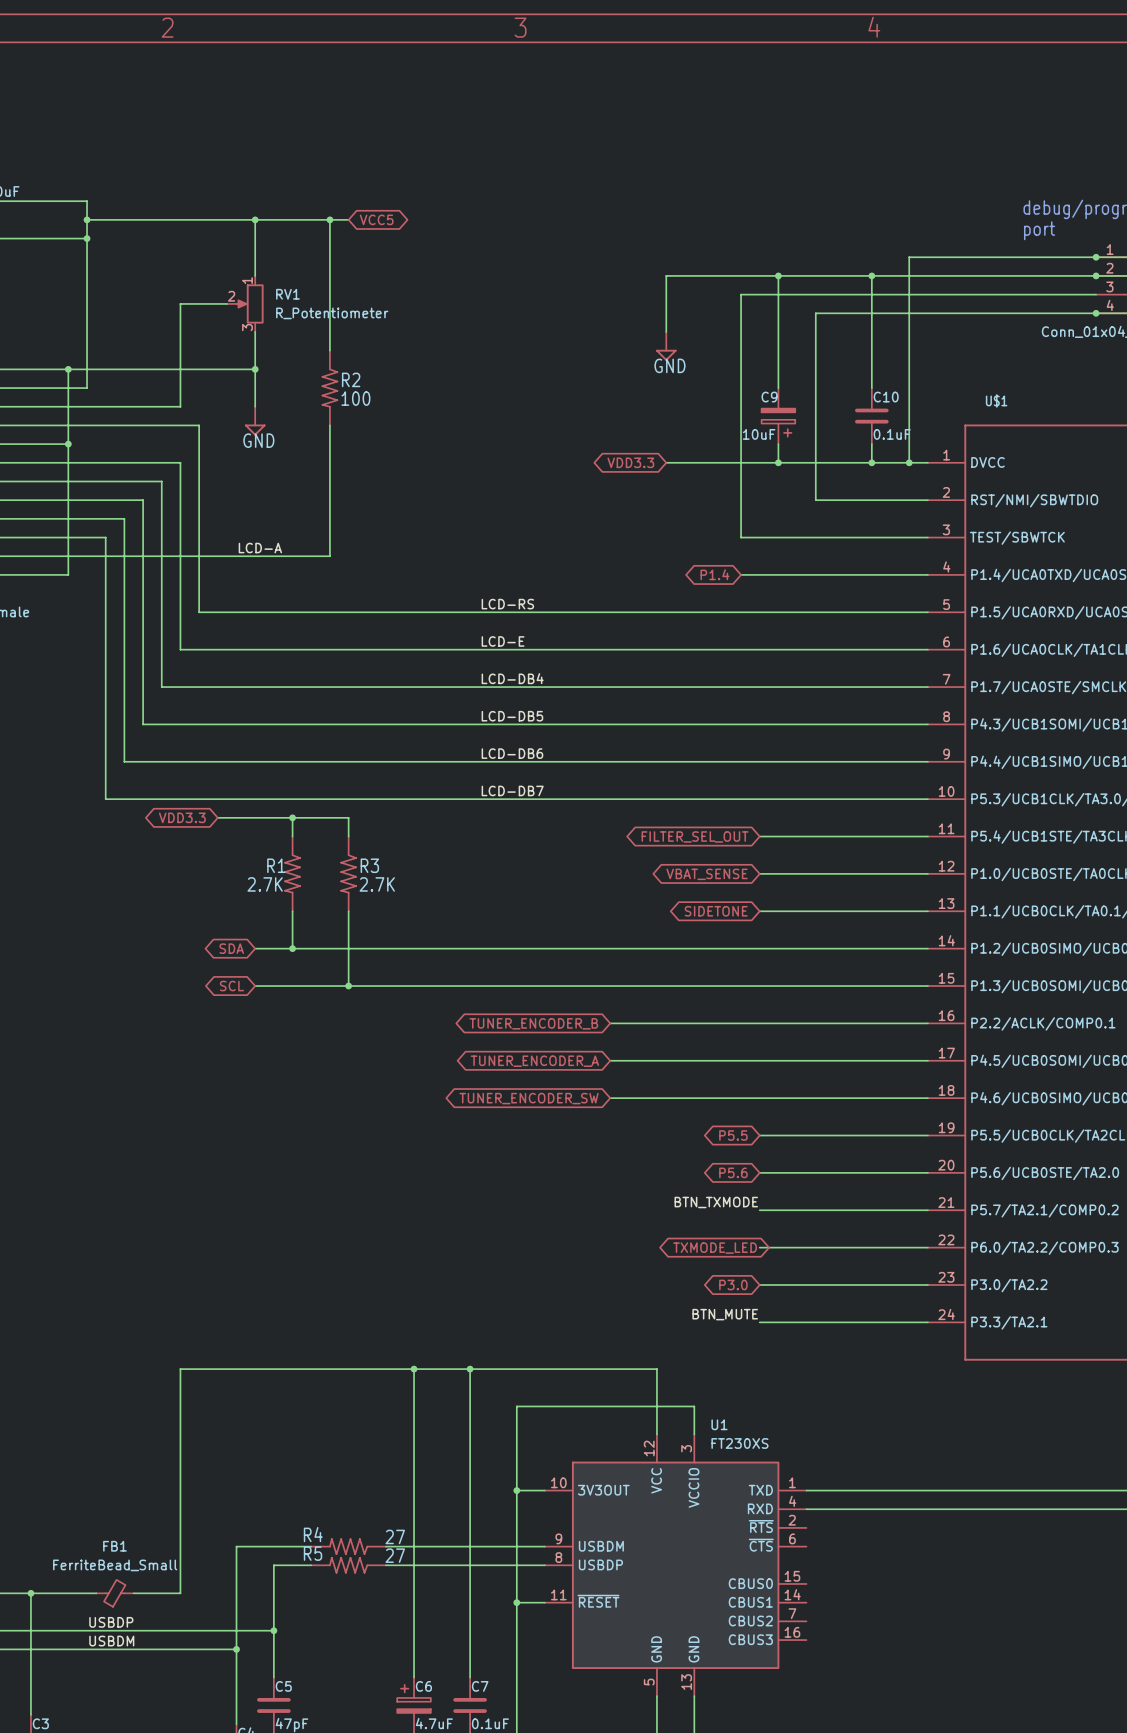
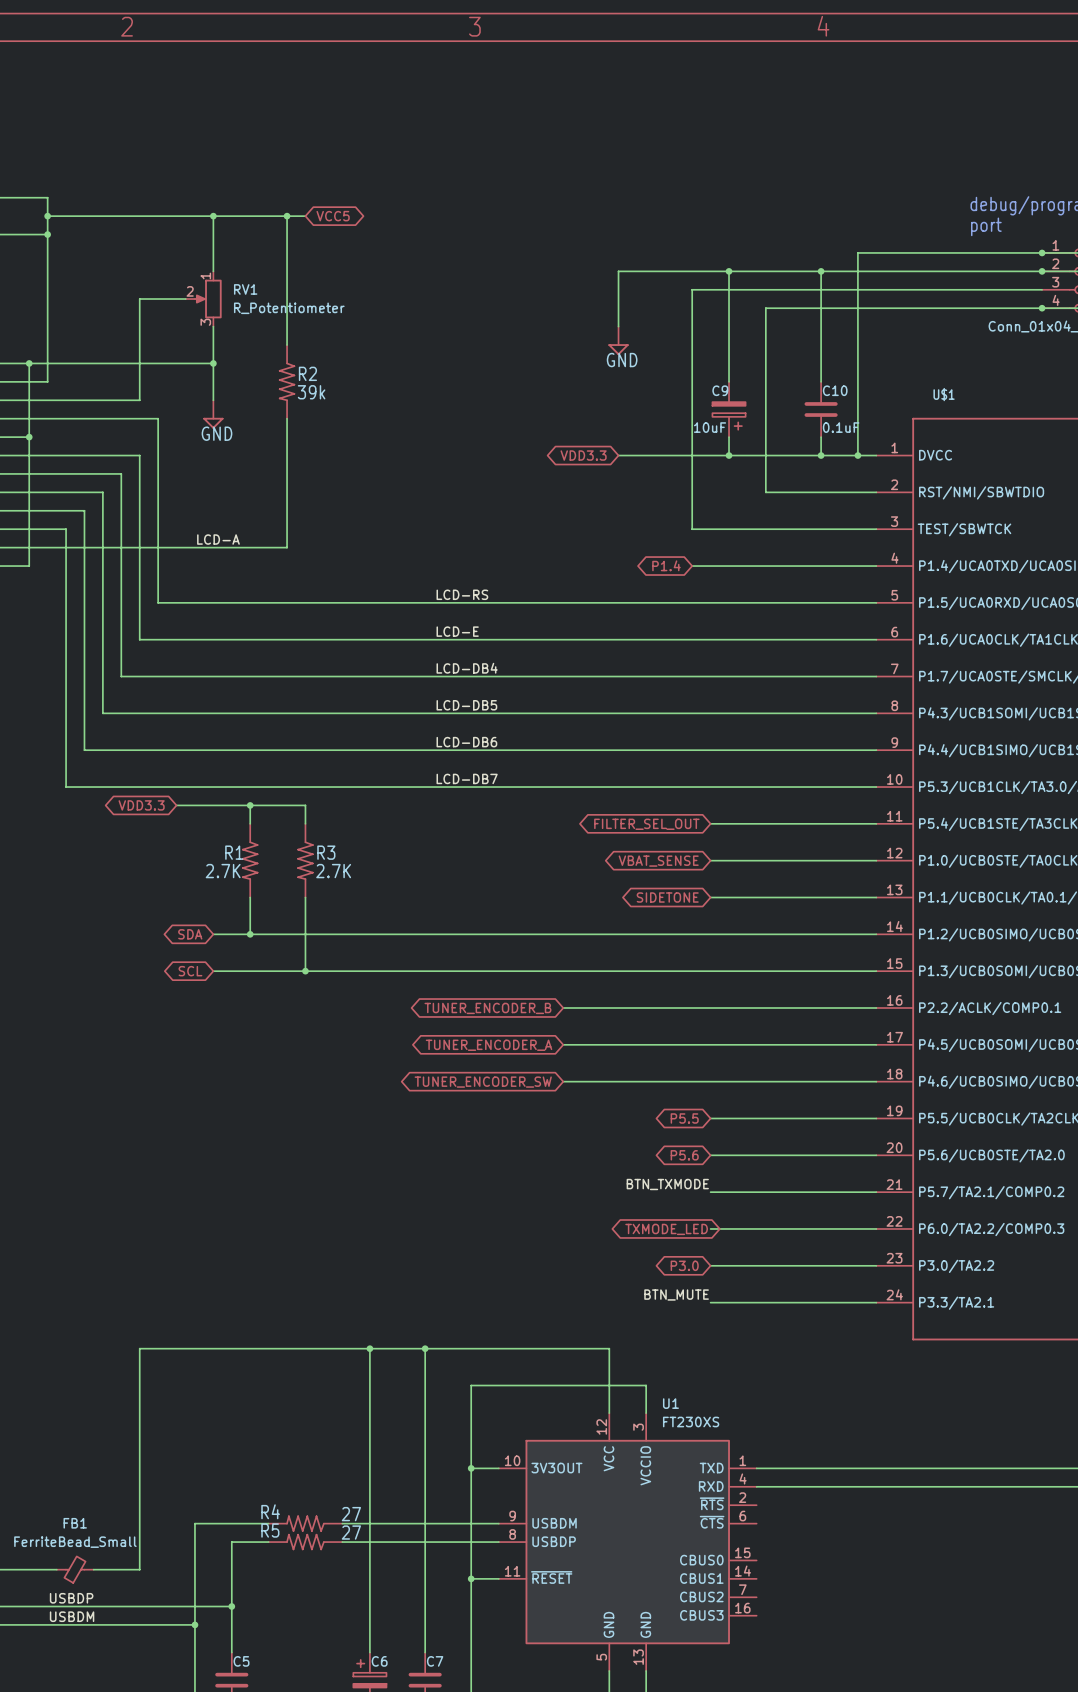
R2 value: 100 (355, 398) -> 39k (311, 392)

